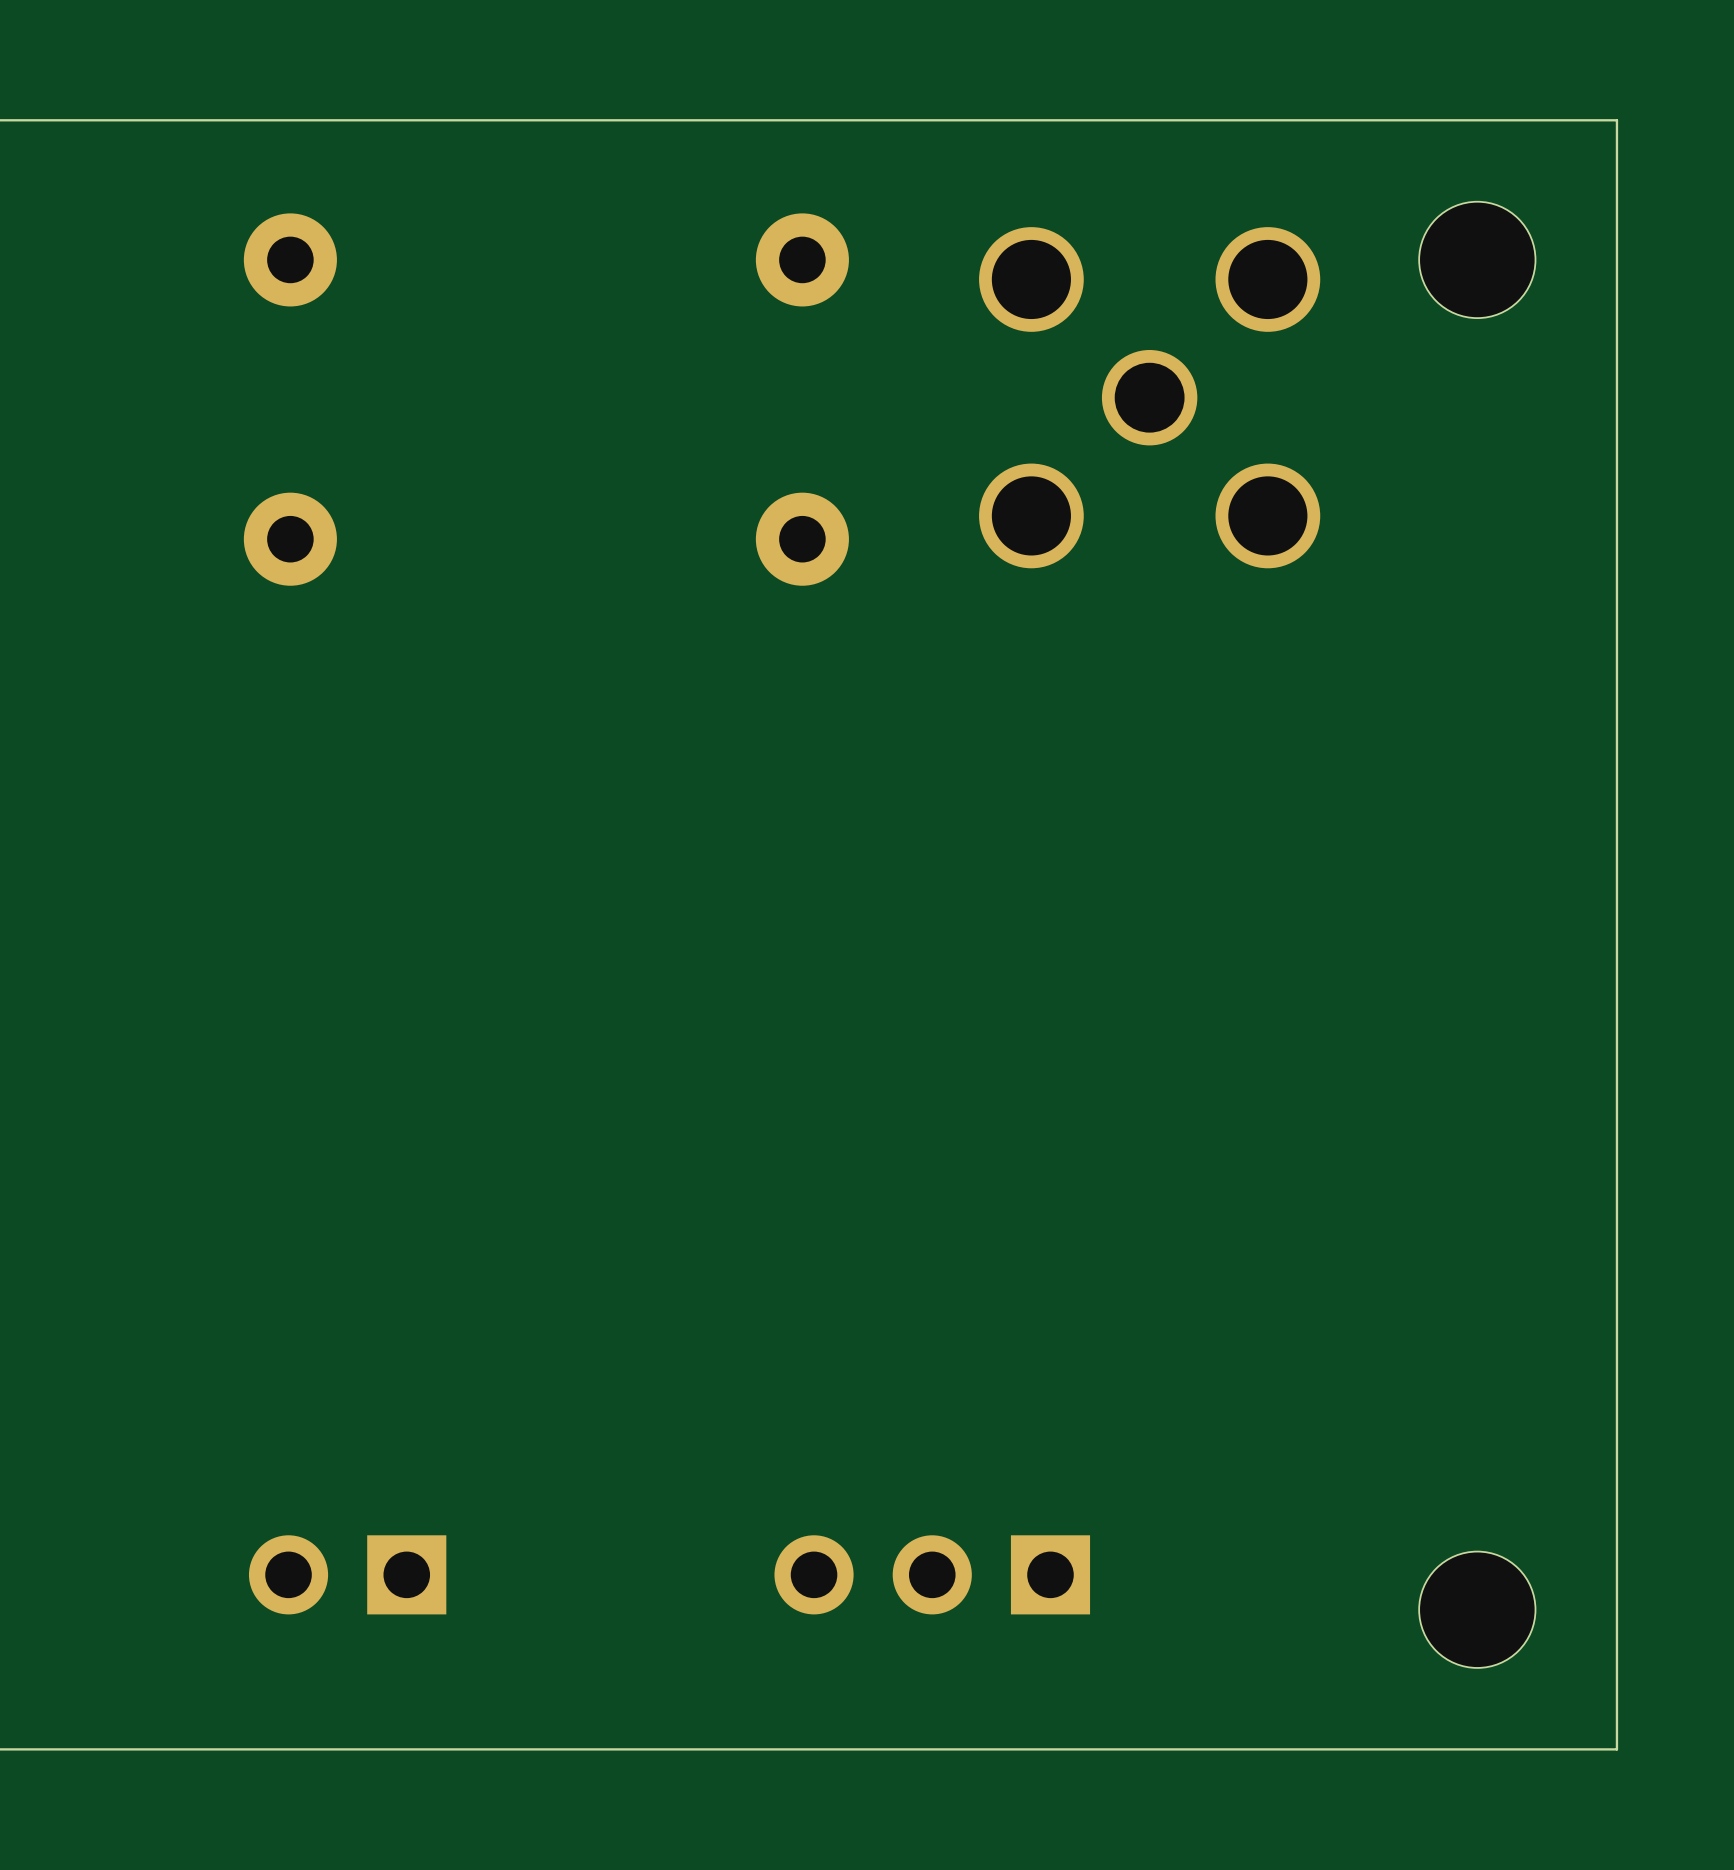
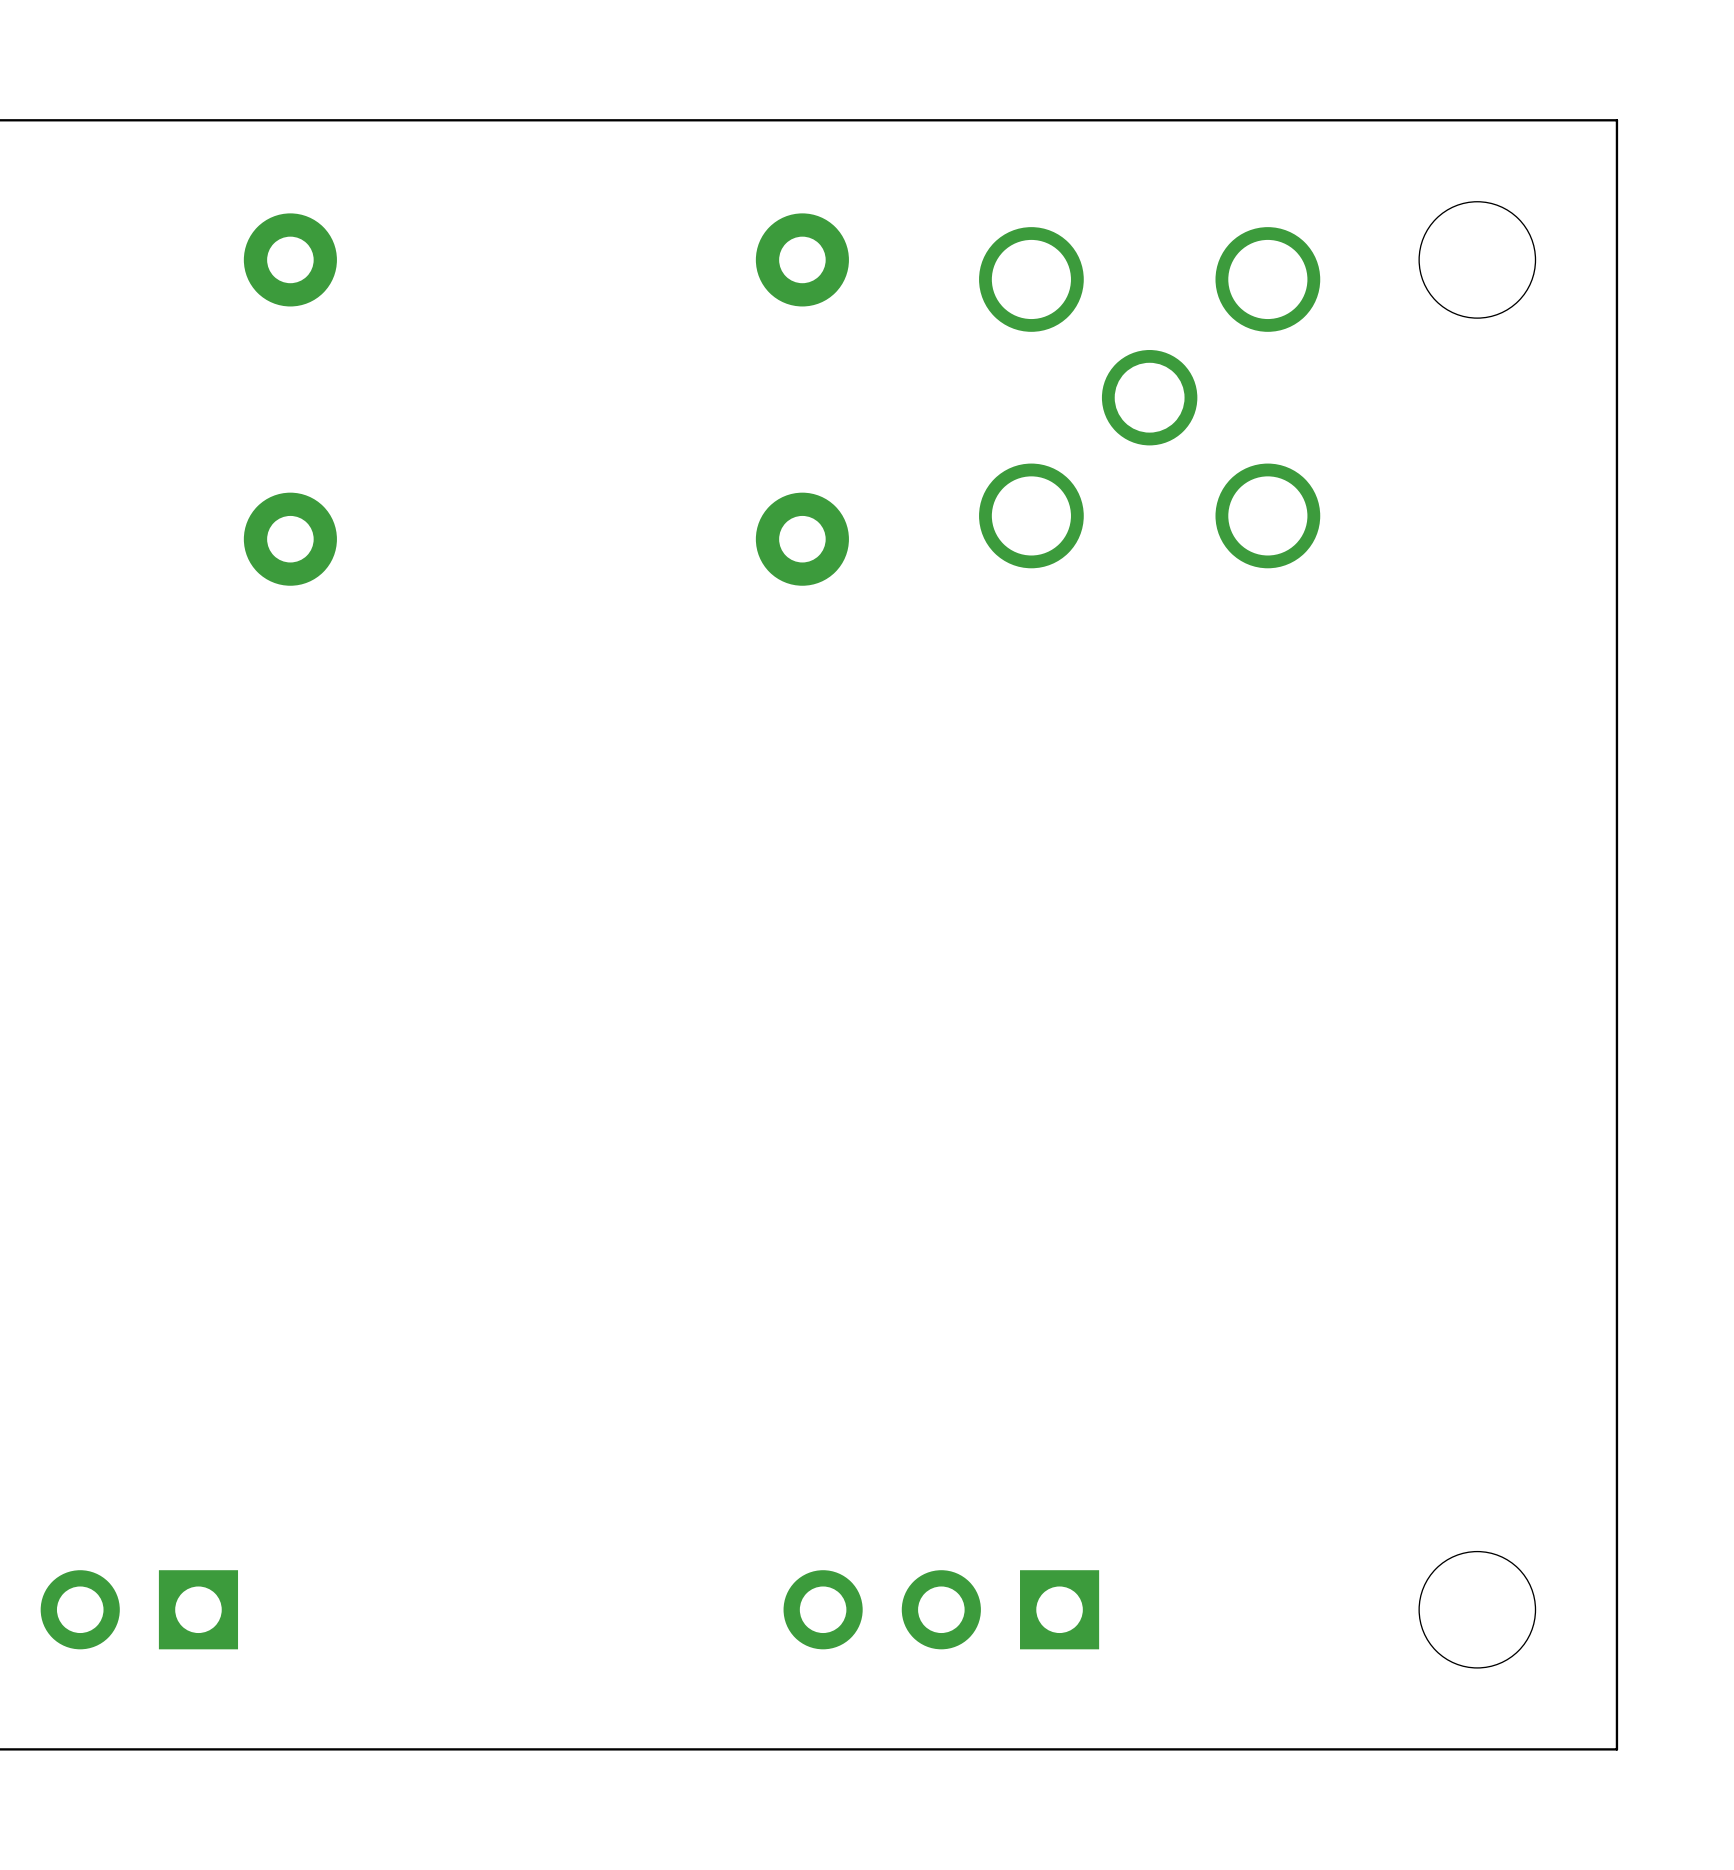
part position: (347, 1574) -> (139, 1609)
part position: (932, 1574) -> (941, 1609)

